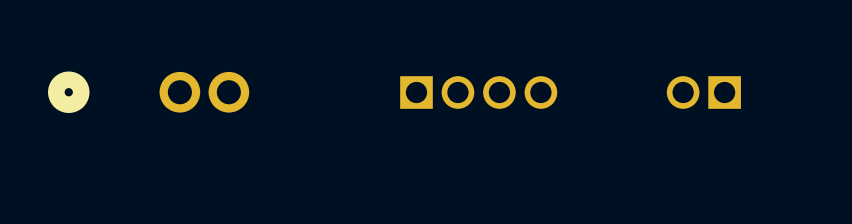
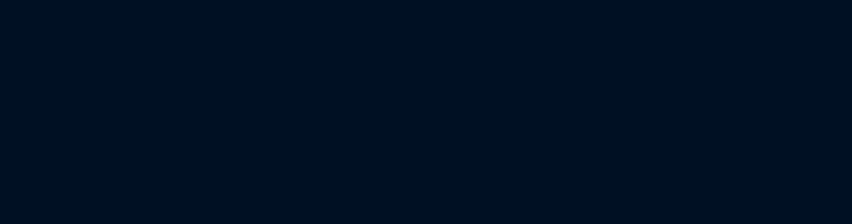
part: (148, 92) -> none
part: (478, 92) -> none
part: (703, 92) -> none

